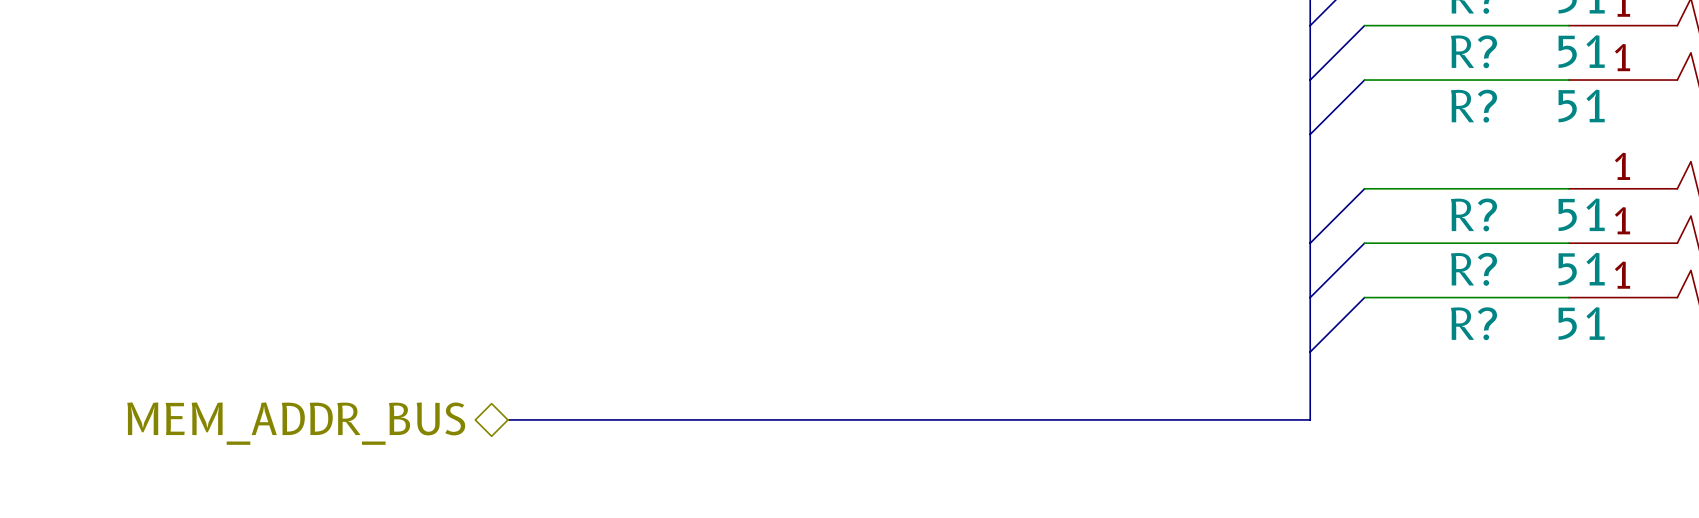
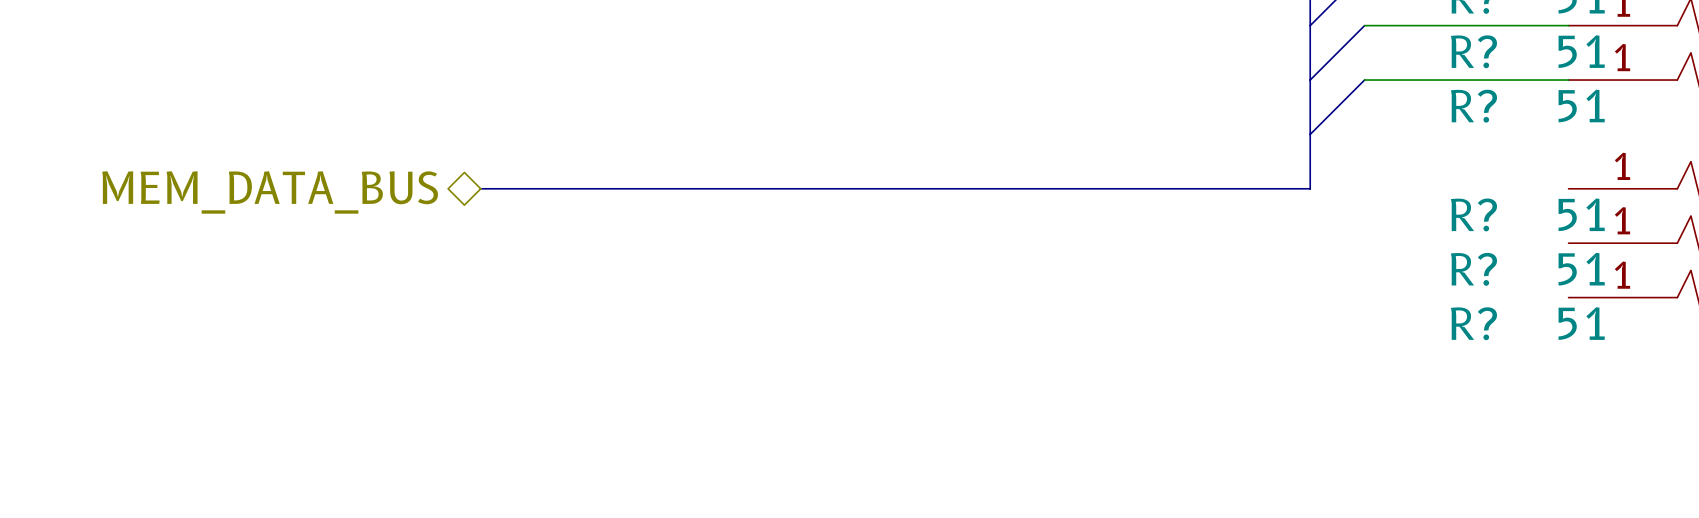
bus: (1310, 188) (1310, 419) (507, 419) -> (1310, 188) (480, 188)
wire: (1364, 188) (1568, 188) -> none
bus: (1364, 188) (1310, 243) -> none
hierarchical label: none -> MEM_DATA_BUS (270, 192)
wire: (1364, 243) (1568, 243) -> none
bus: (1364, 243) (1310, 297) -> none
wire: (1364, 297) (1568, 297) -> none
bus: (1364, 297) (1310, 351) -> none
hierarchical label: MEM_ADDR_BUS (296, 423) -> none

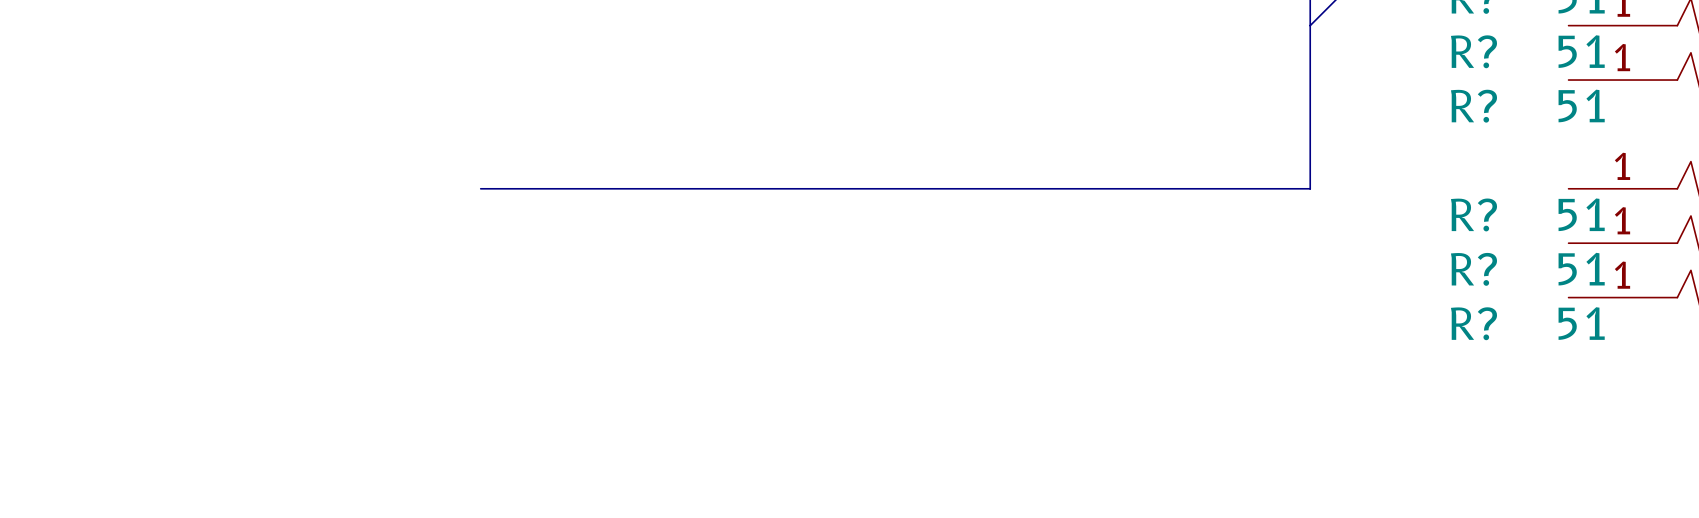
wire: (1364, 25) (1568, 25) -> none
bus: (1364, 25) (1310, 80) -> none
wire: (1364, 80) (1568, 80) -> none
bus: (1364, 80) (1310, 134) -> none
hierarchical label: MEM_DATA_BUS (270, 192) -> none

